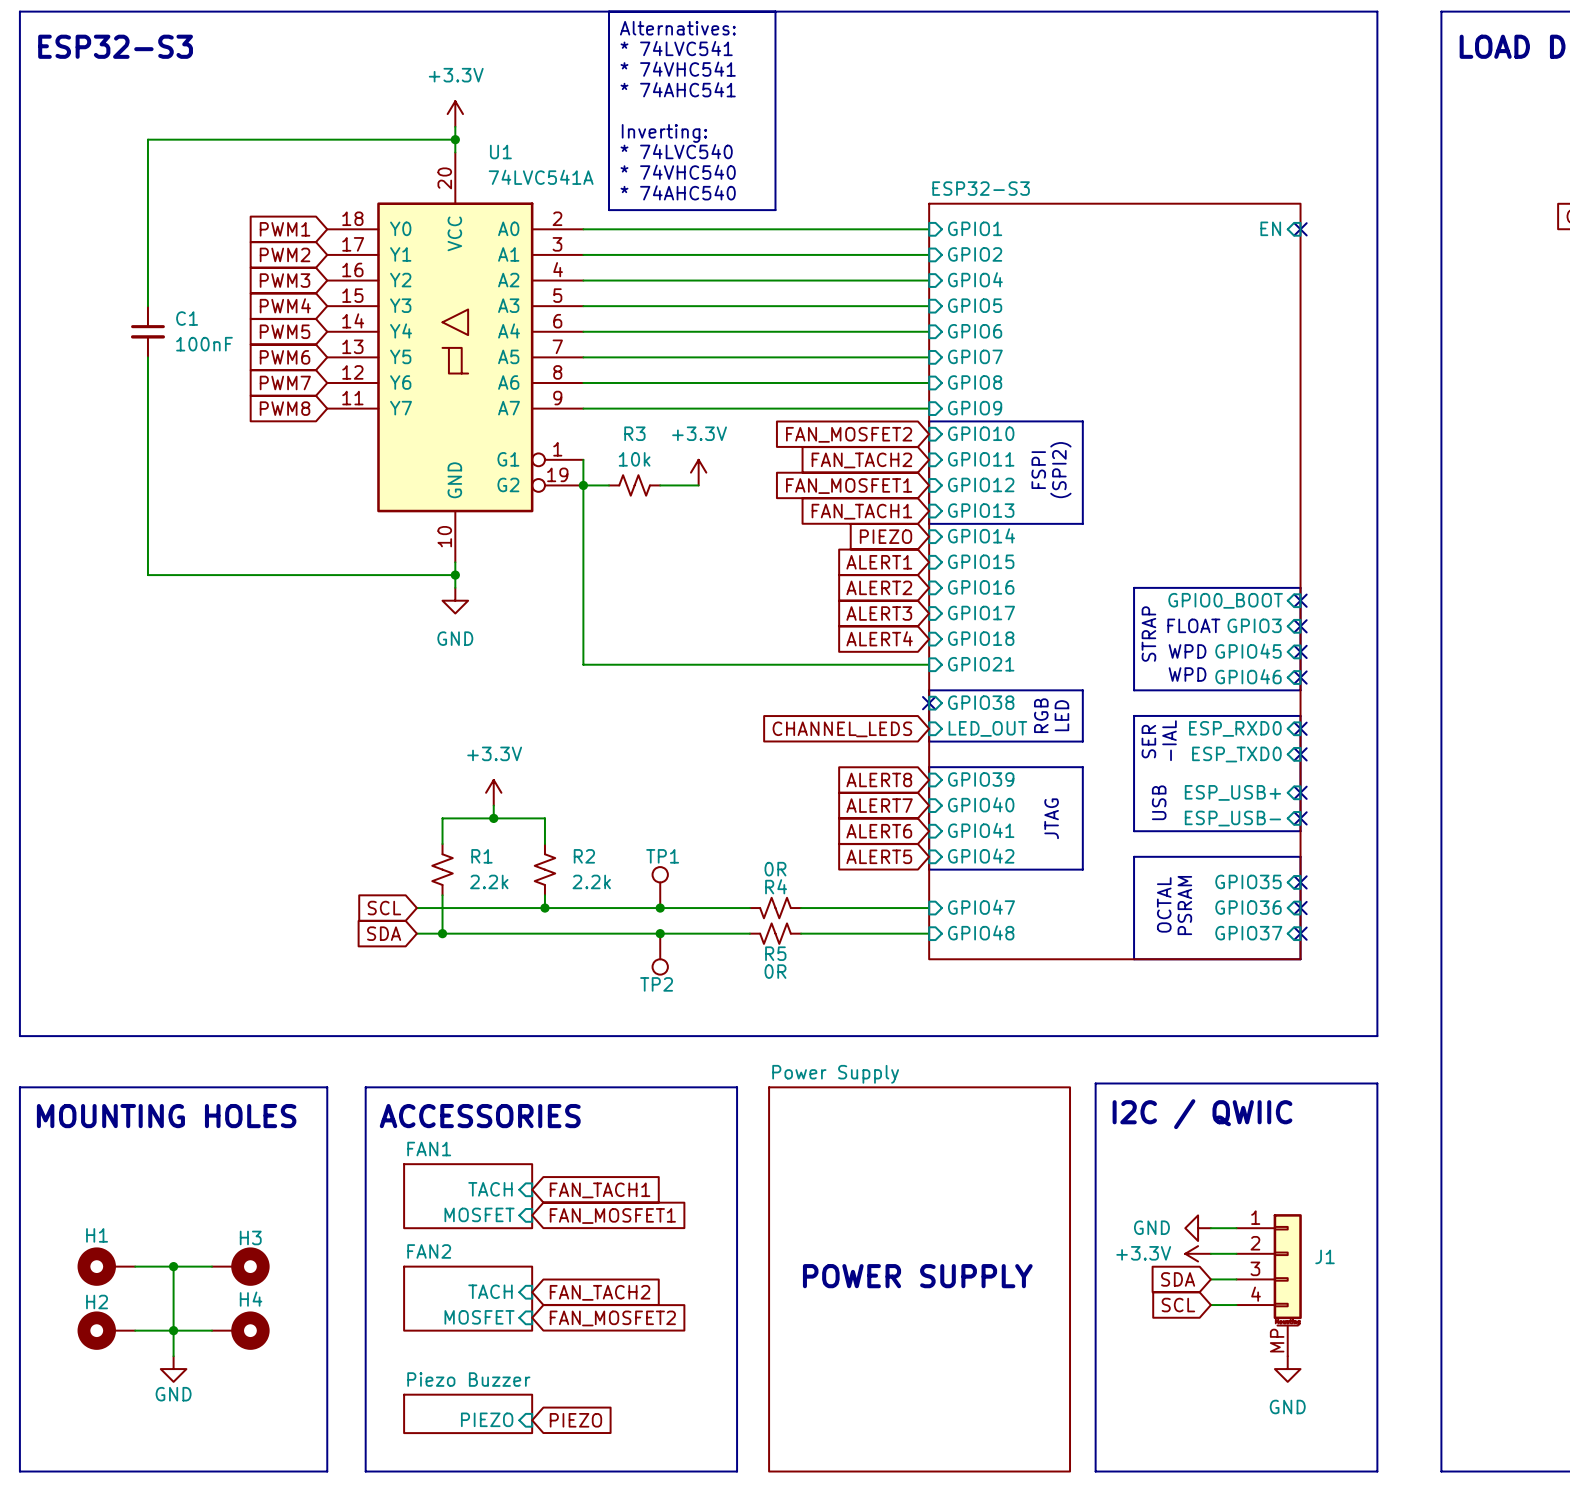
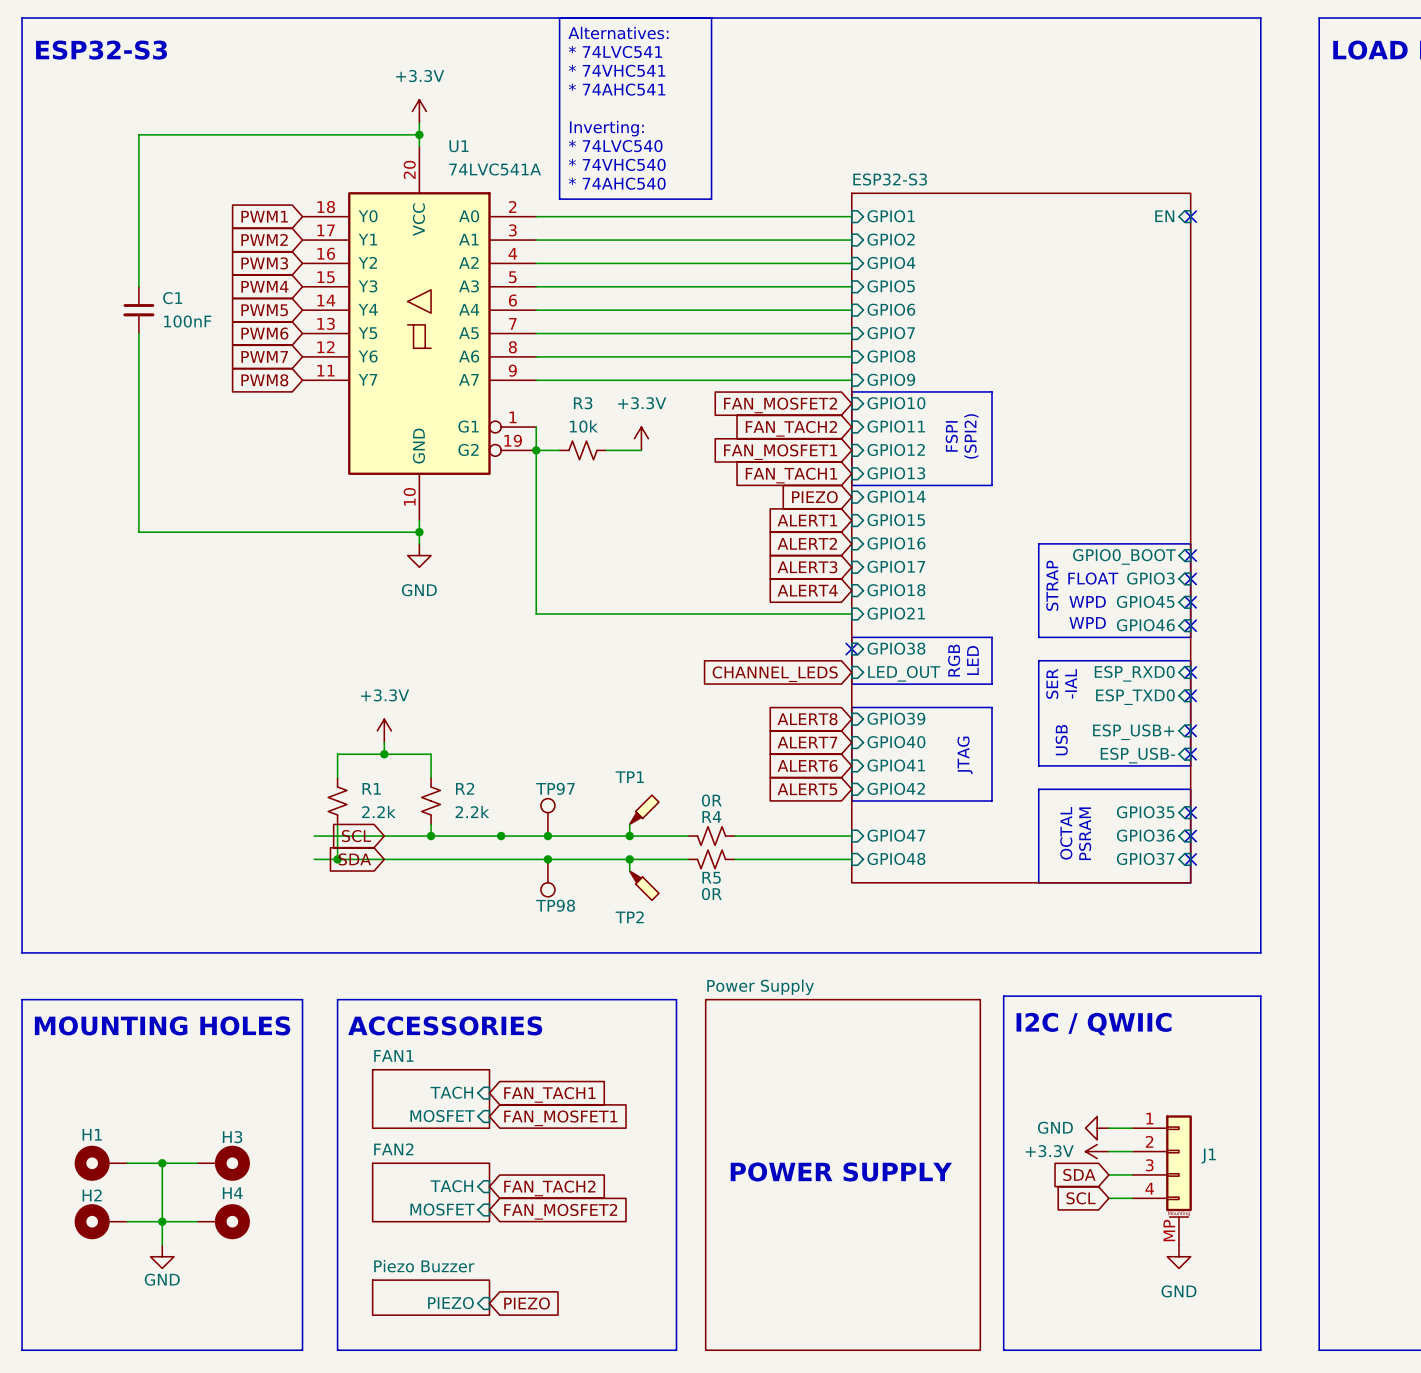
power symbol position: +3.3V (493, 792) -> +3.3V (384, 730)
wire: (493, 805) (493, 818) -> (384, 742) (384, 754)
junction: none -> (384, 754)
wire: (442, 818) (442, 844) -> (407, 754) (337, 754) (337, 777)
wire: (468, 818) (544, 818) (544, 844) -> (431, 754) (431, 777)
junction: (493, 818) -> none
TP1 symbol: [652, 867, 668, 909] -> [629, 795, 659, 825]
R1 position: (442, 869) -> (337, 800)
R2 position: (544, 869) -> (431, 800)
TP97: none -> (547, 817)
wire: (442, 895) (442, 933) -> (337, 824) (337, 859)
wire: (544, 895) (544, 908) -> (431, 824) (431, 836)
wire: none -> (629, 824) (629, 836)
wire: none -> (314, 836) (384, 836)
junction: none -> (547, 836)
junction: (660, 908) -> none
junction: none -> (629, 836)
wire: none -> (314, 859) (384, 859)
junction: none -> (337, 859)
junction position: (442, 933) -> (431, 836)
junction: none -> (547, 859)
TP2 symbol: [652, 933, 668, 975] -> [629, 871, 659, 901]
junction: (660, 933) -> none
wire: none -> (629, 859) (629, 871)
junction: none -> (629, 859)
TP98: none -> (547, 878)

